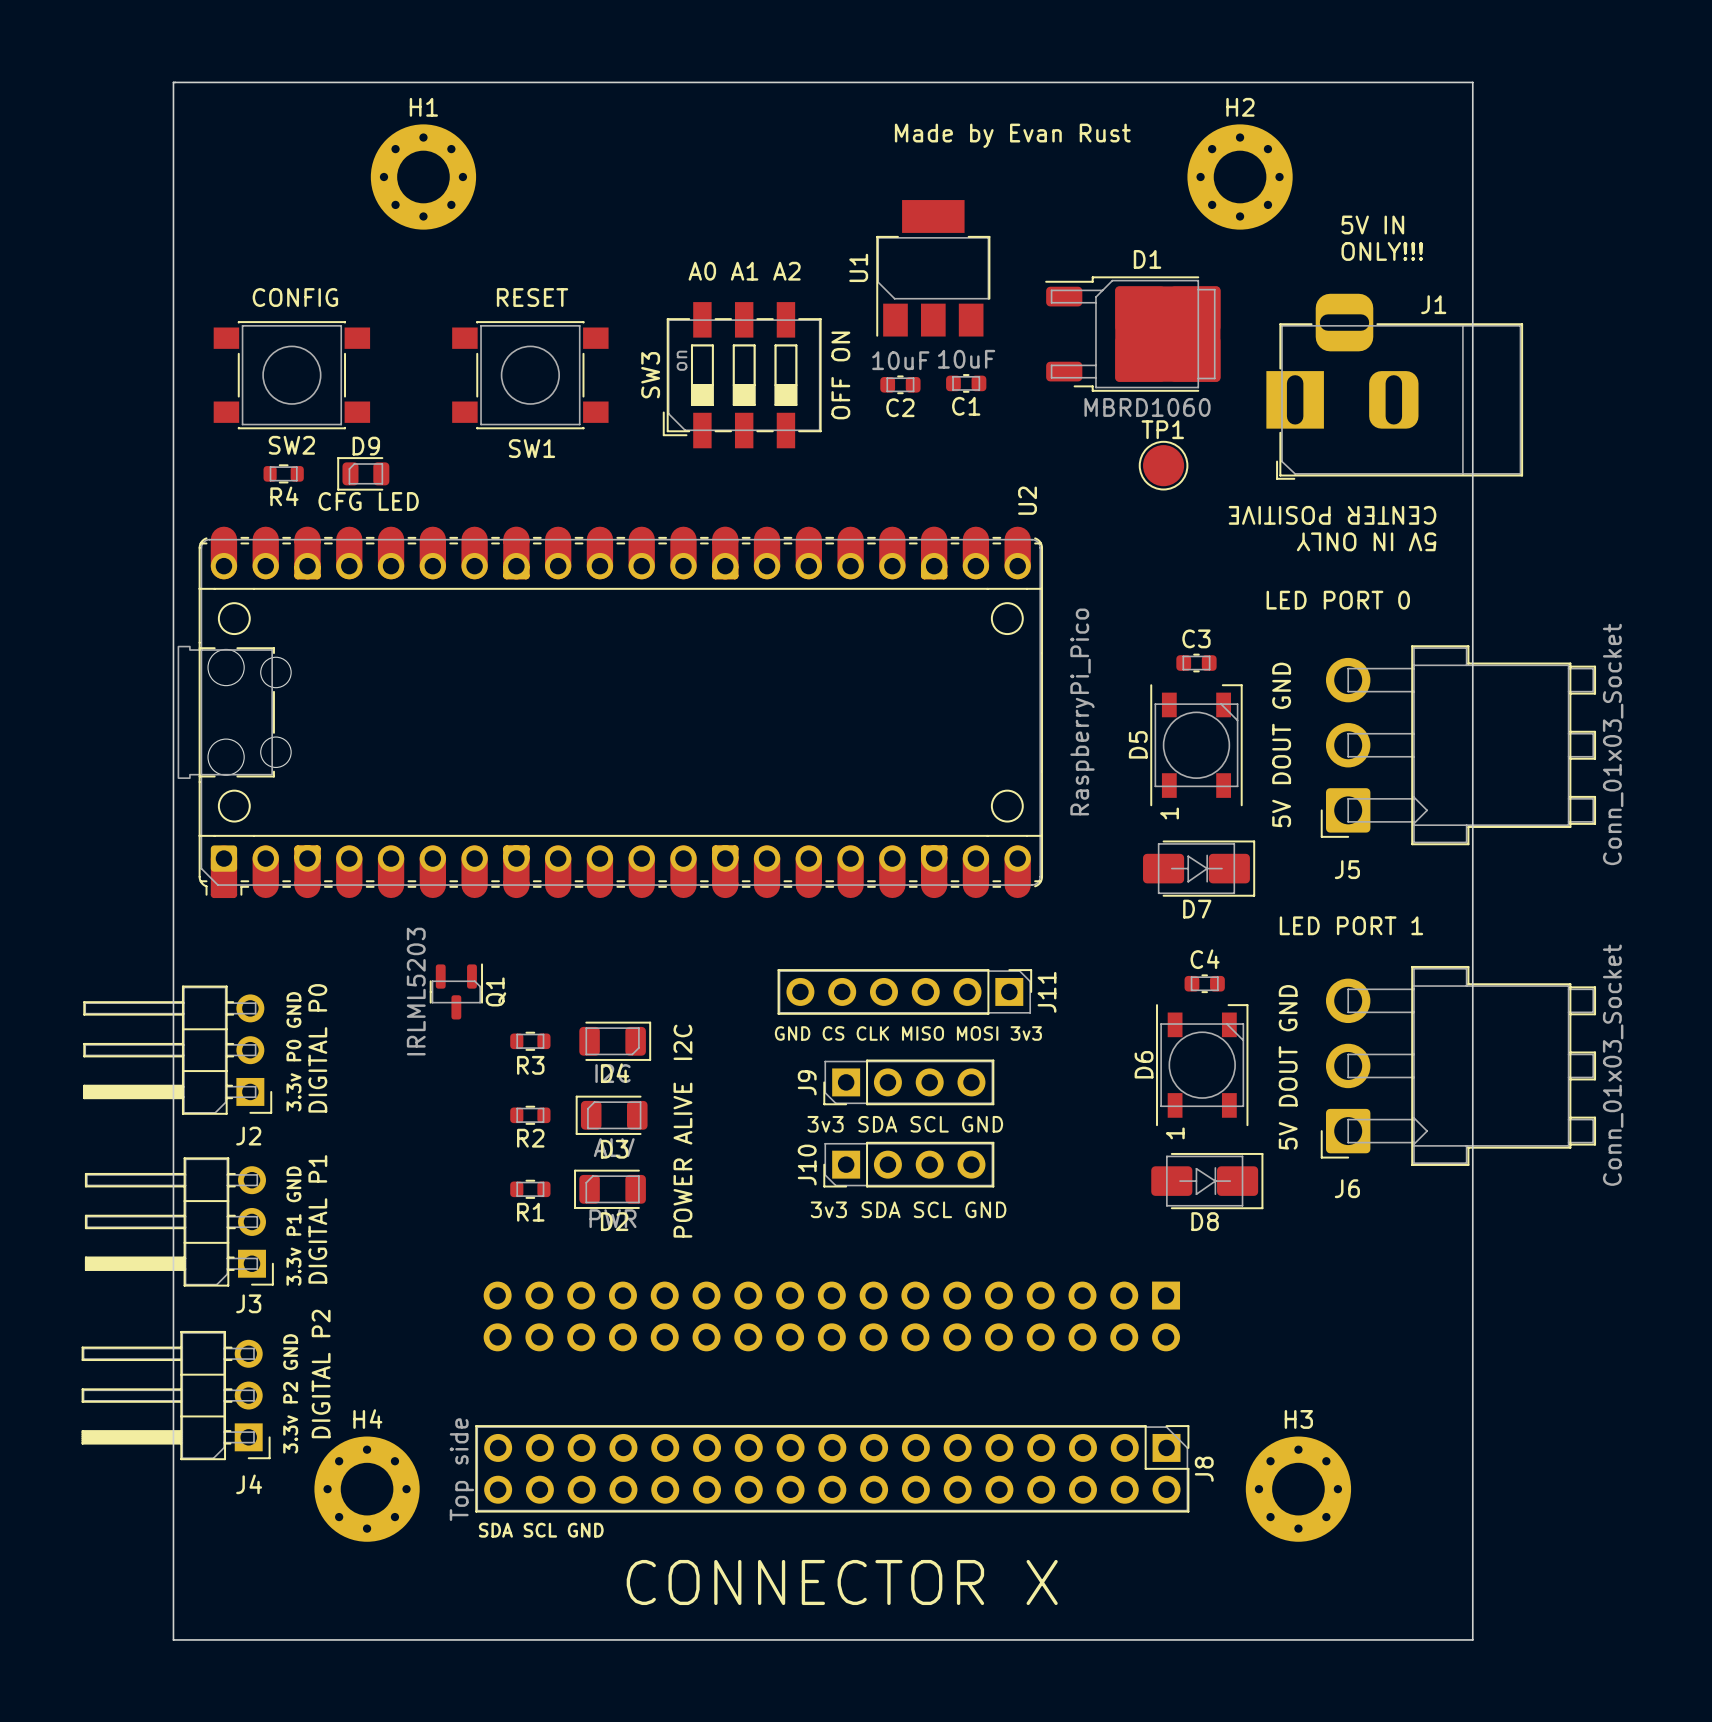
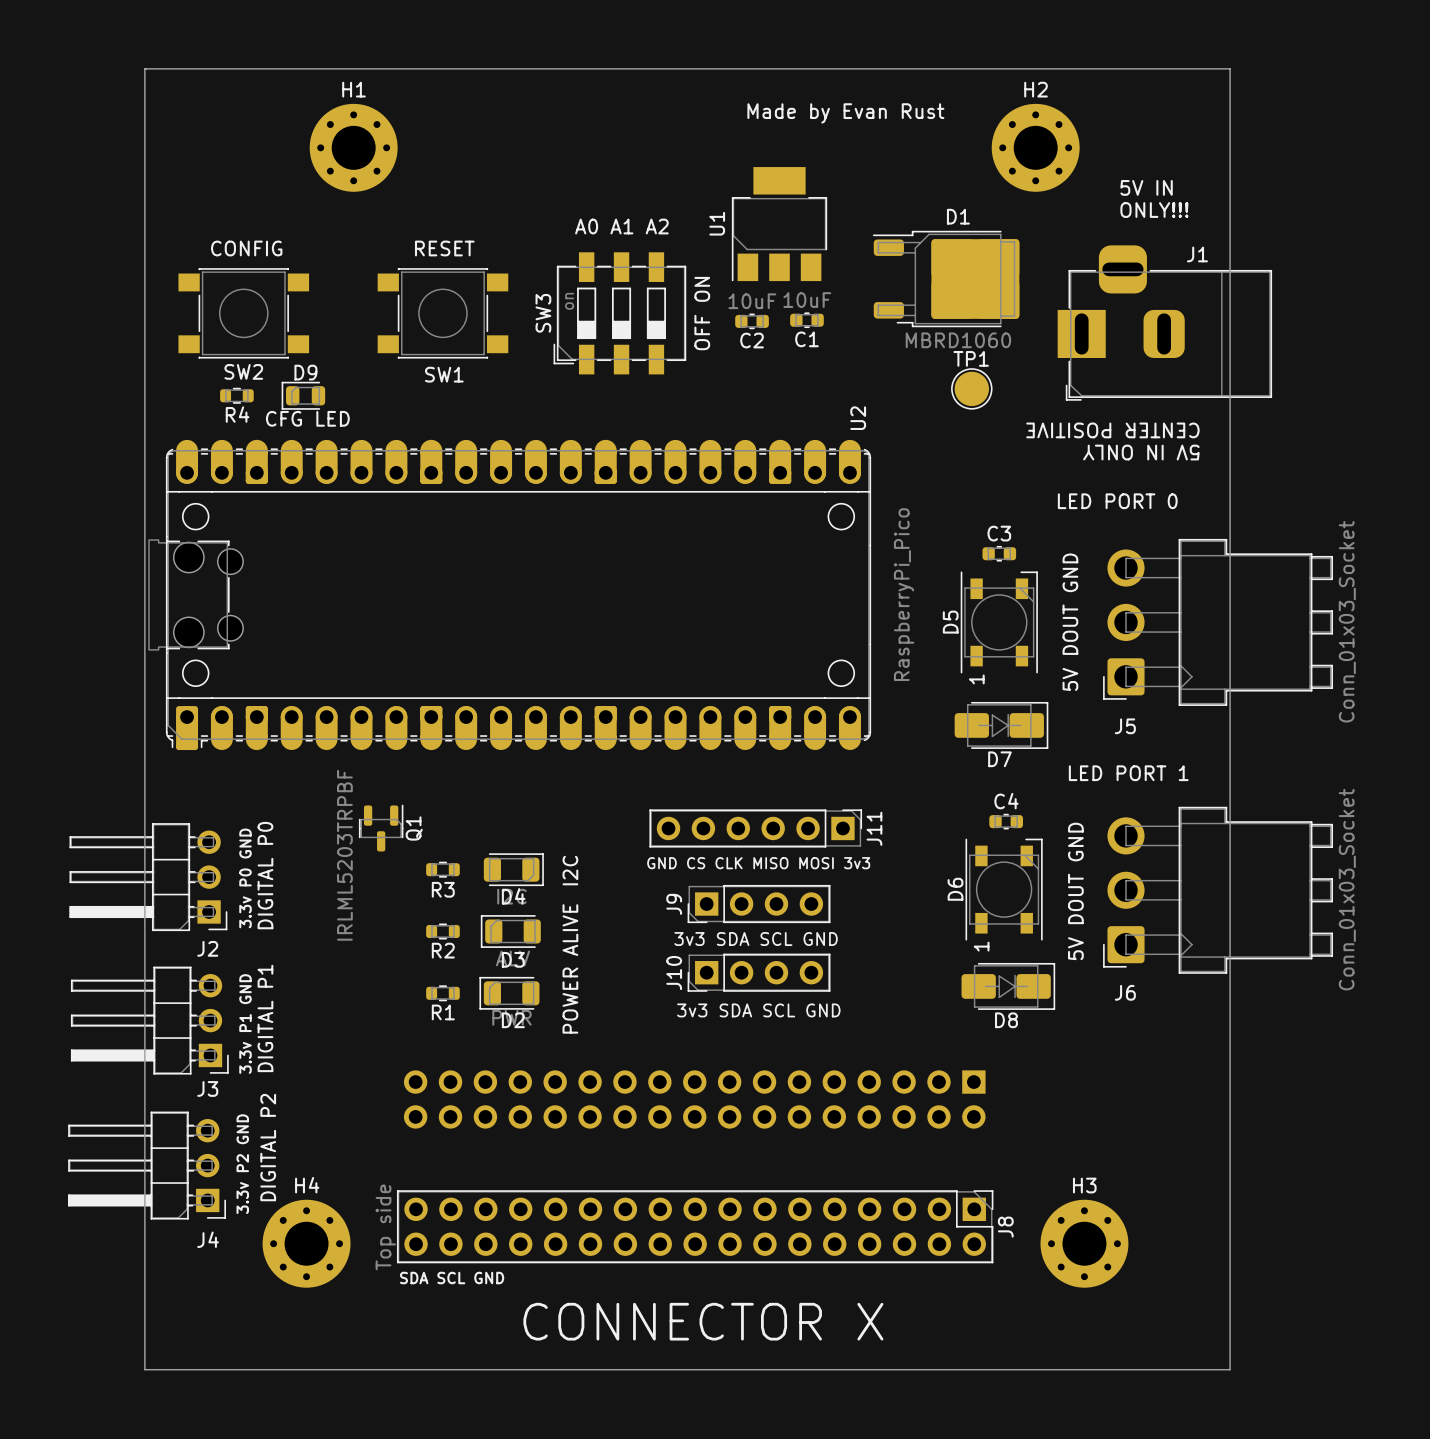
Q1 value: IRLML5203 (416, 991) -> IRLML5203TRPBF (344, 855)

